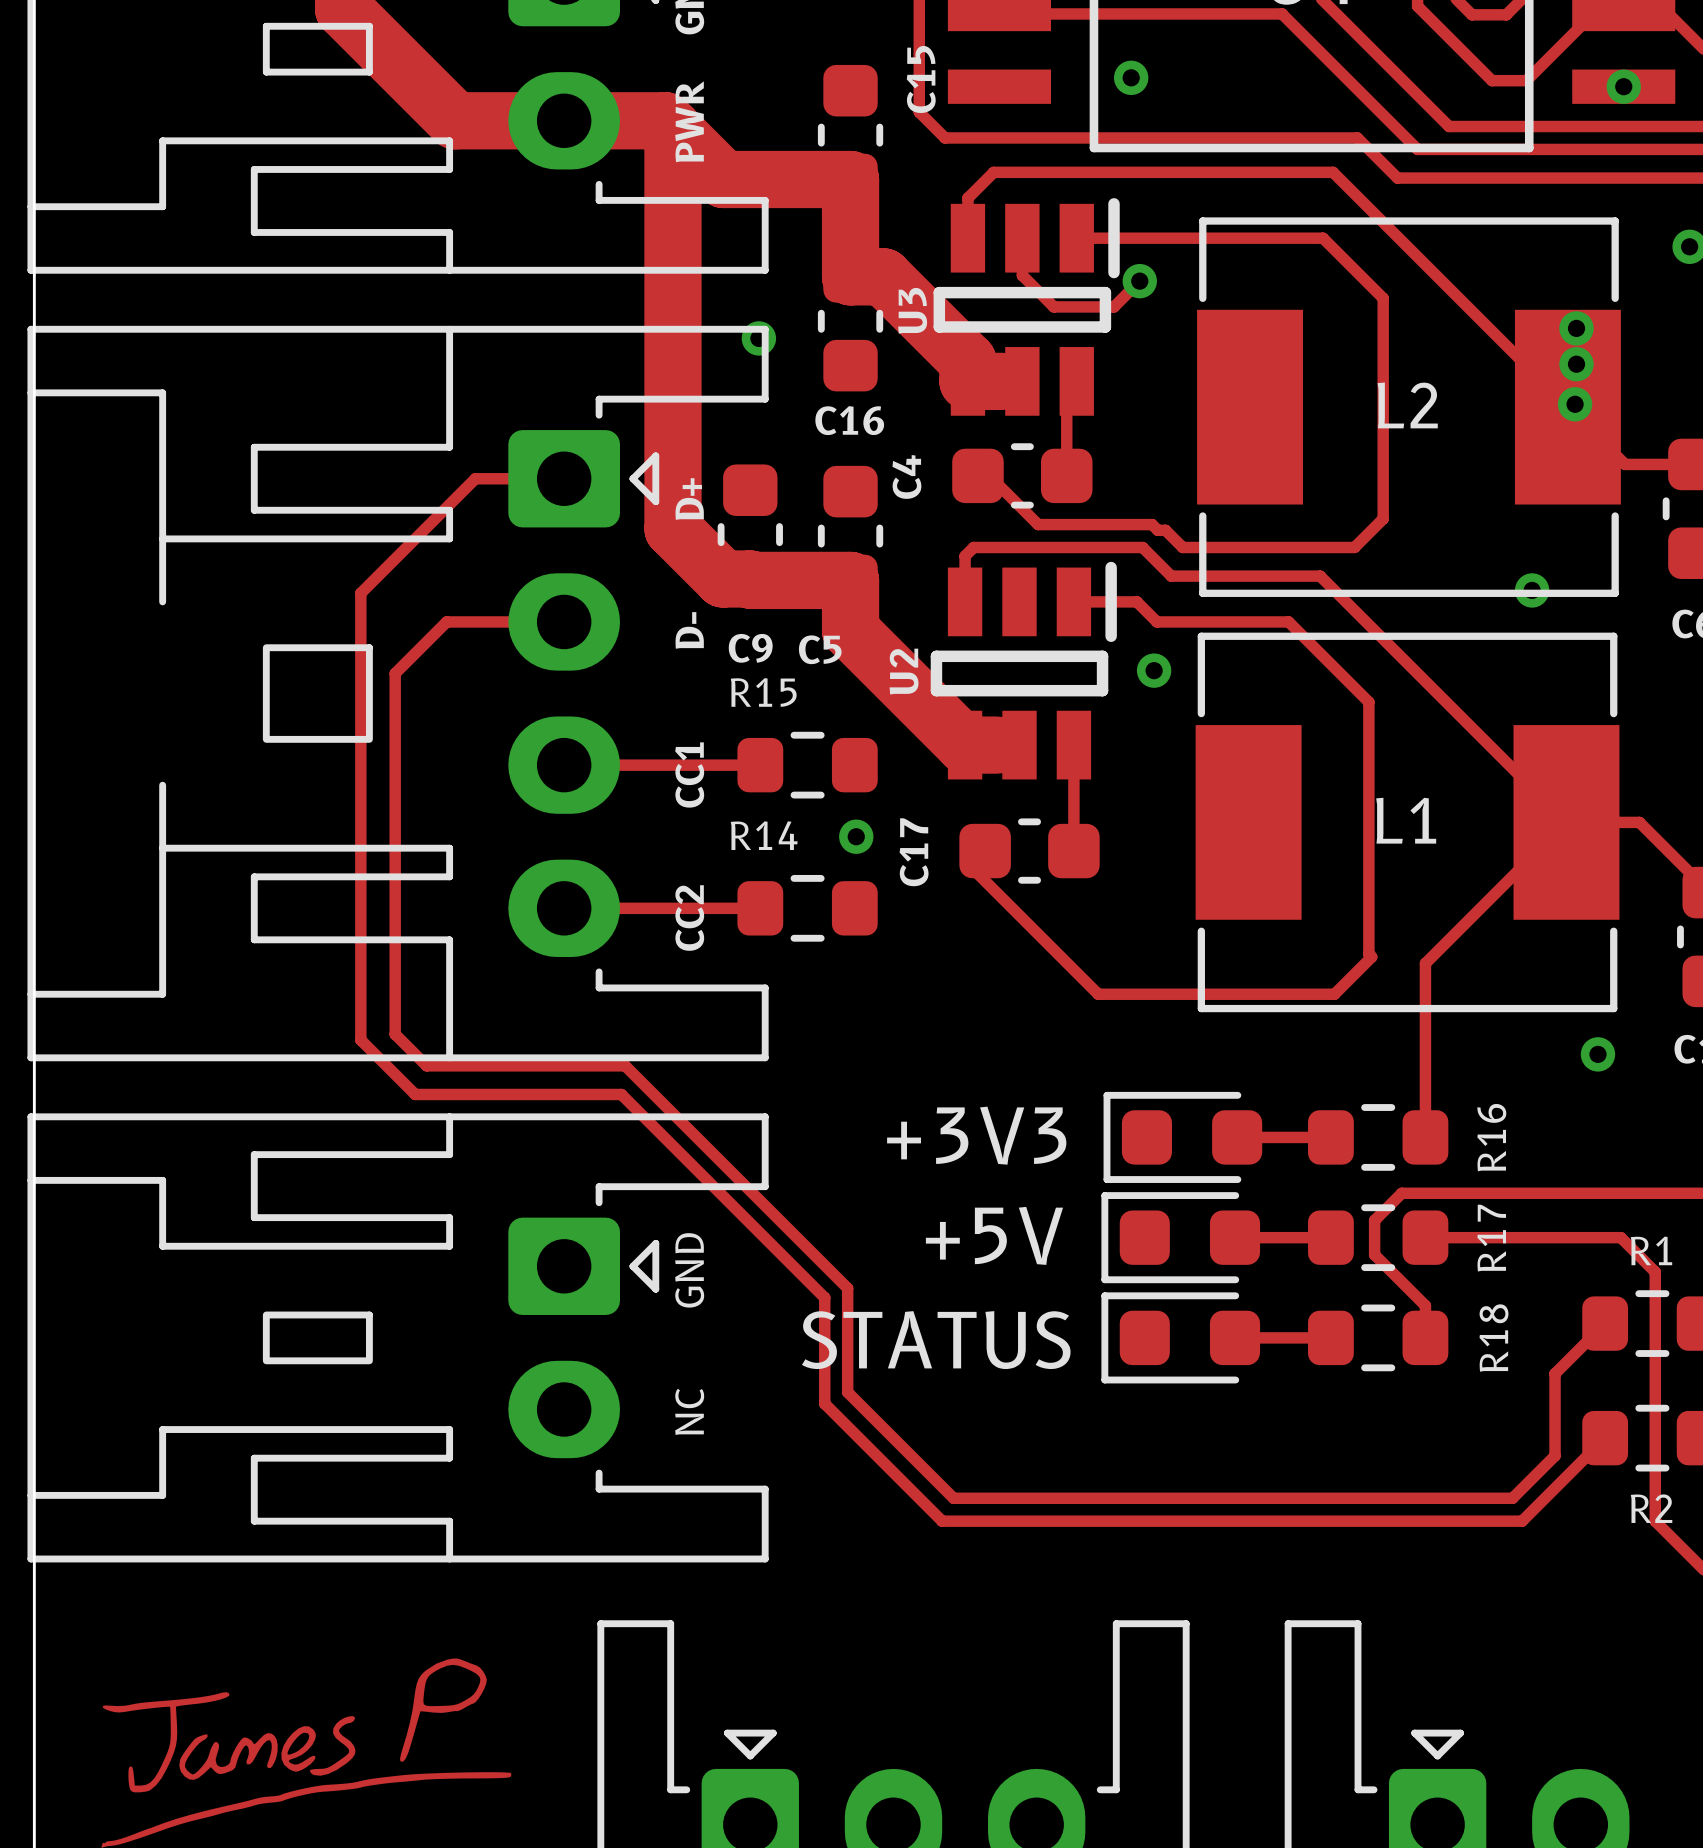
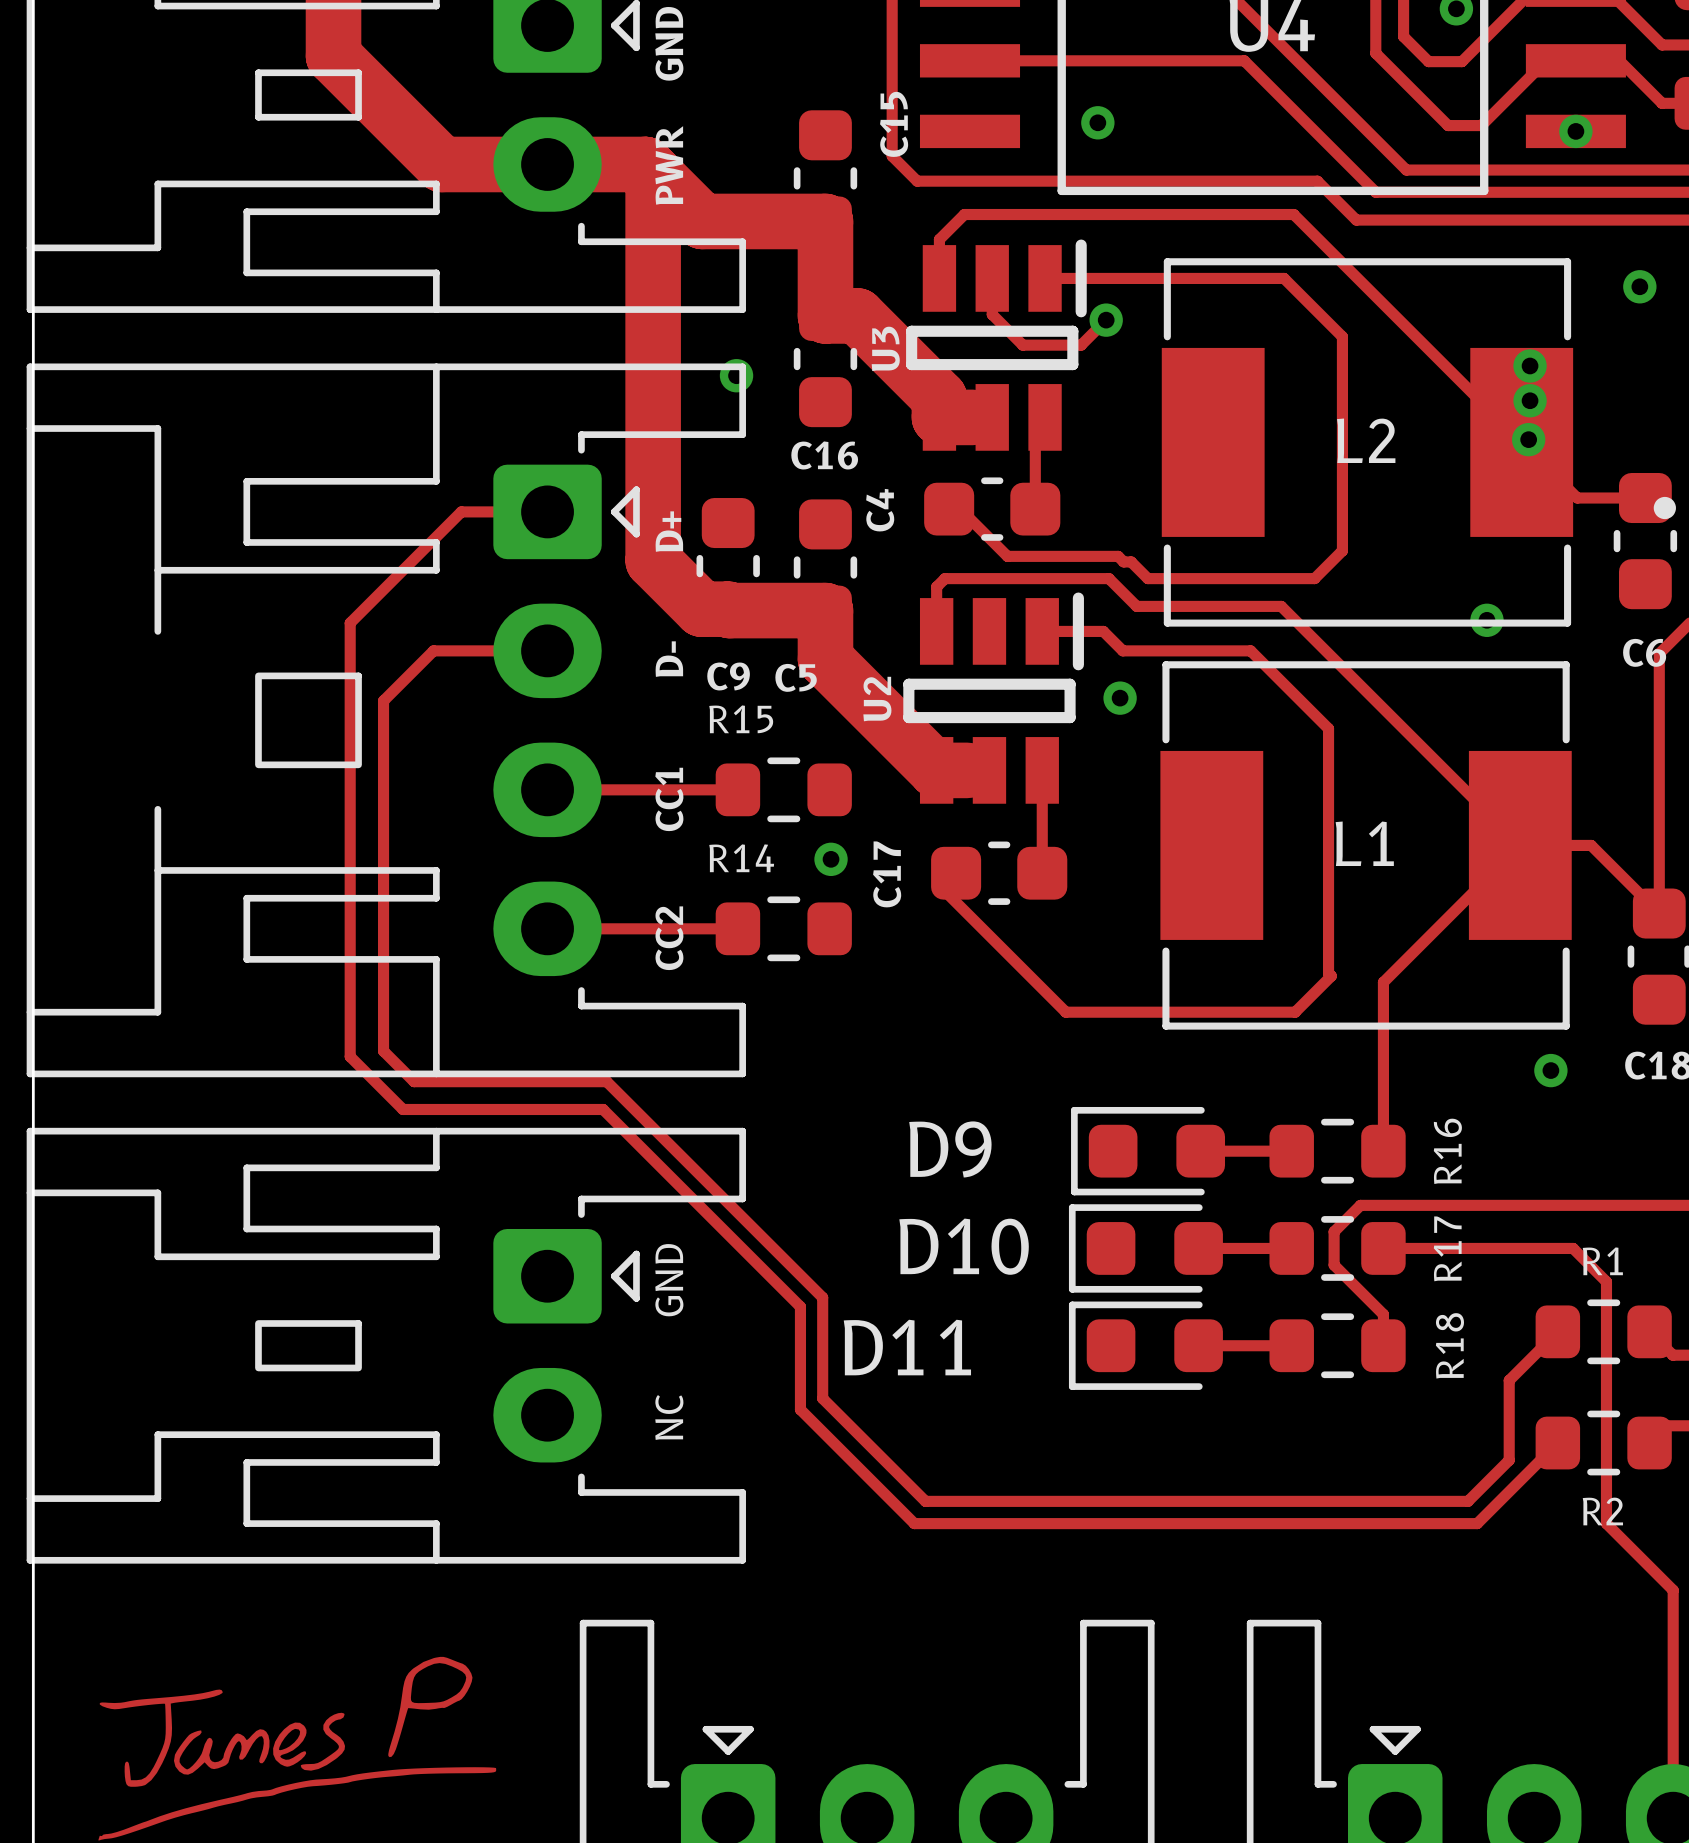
+3V3 name: +3V3 (976, 1135) -> D9 (950, 1149)
+5V name: +5V (994, 1235) -> D10 (964, 1246)
STATUS name: STATUS (936, 1340) -> D11 (907, 1347)

